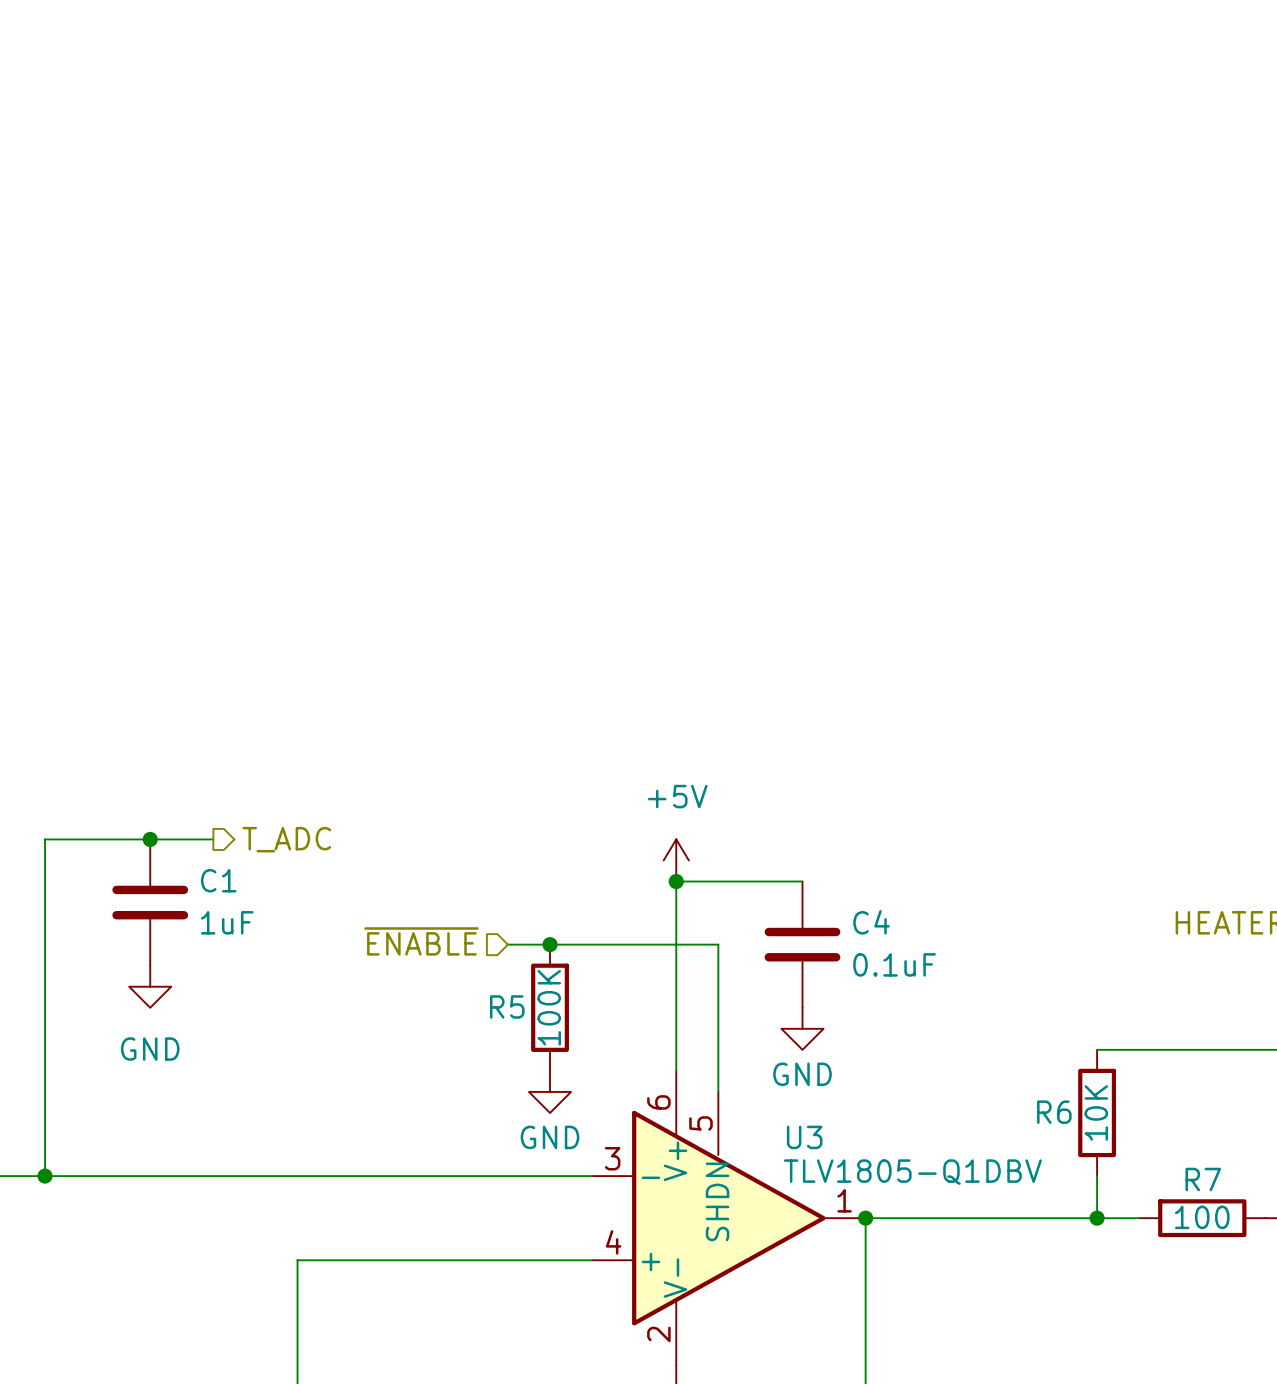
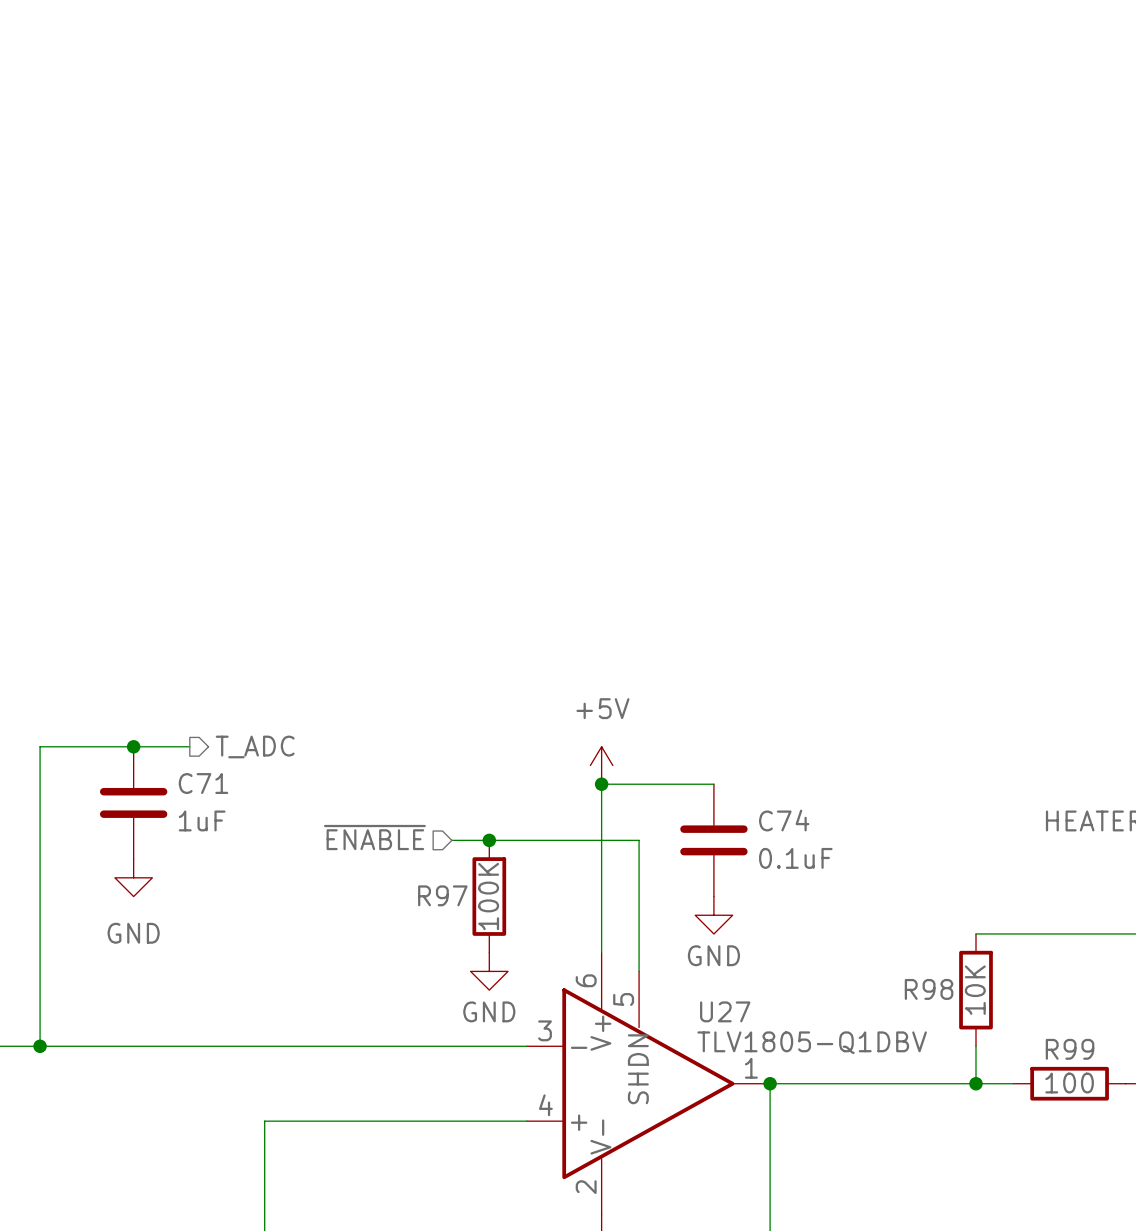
C1 name: C1 (218, 880) -> C71 (203, 783)
C4 name: C4 (871, 922) -> C74 (784, 820)
R5 name: R5 (507, 1006) -> R97 (442, 895)
R6 name: R6 (1054, 1112) -> R98 (929, 989)
U3 name: U3 (804, 1137) -> U27 (725, 1011)
R7 name: R7 (1203, 1179) -> R99 (1070, 1049)

